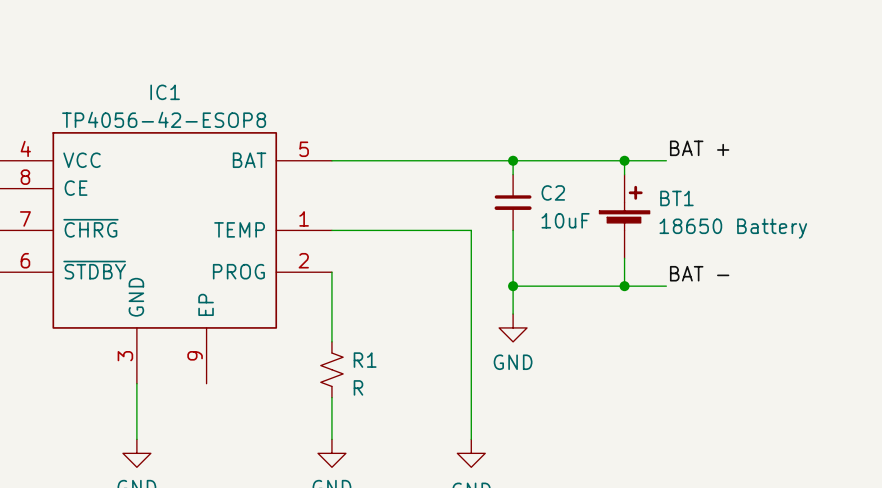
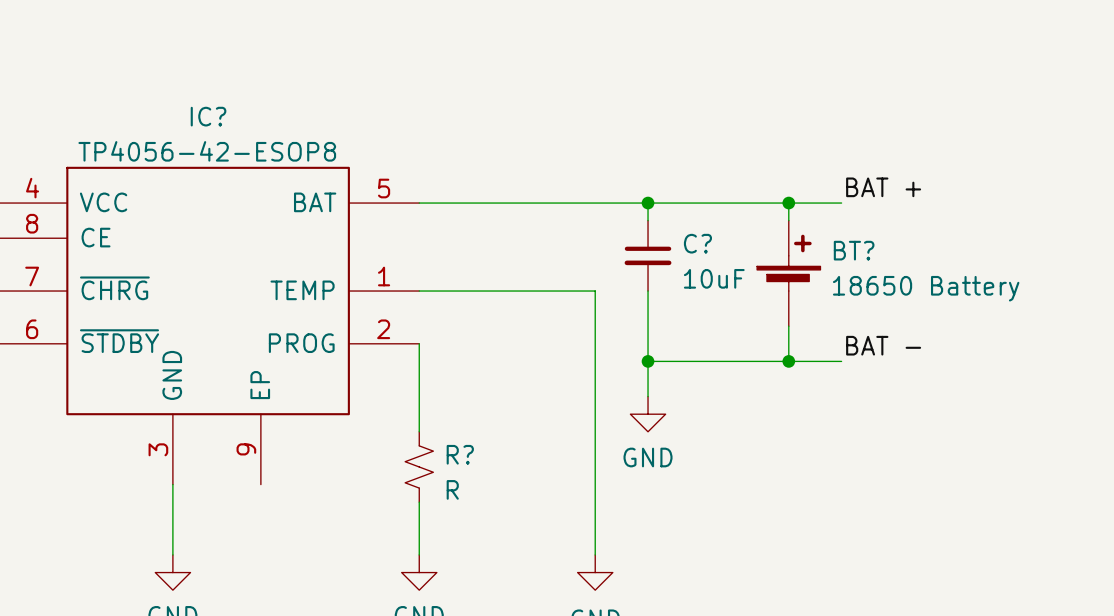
IC1 name: IC1 (165, 92) -> IC? (208, 116)
C2 name: C2 (553, 192) -> C? (697, 243)
BT1 name: BT1 (676, 198) -> BT? (854, 250)
R1 name: R1 (365, 360) -> R? (460, 454)

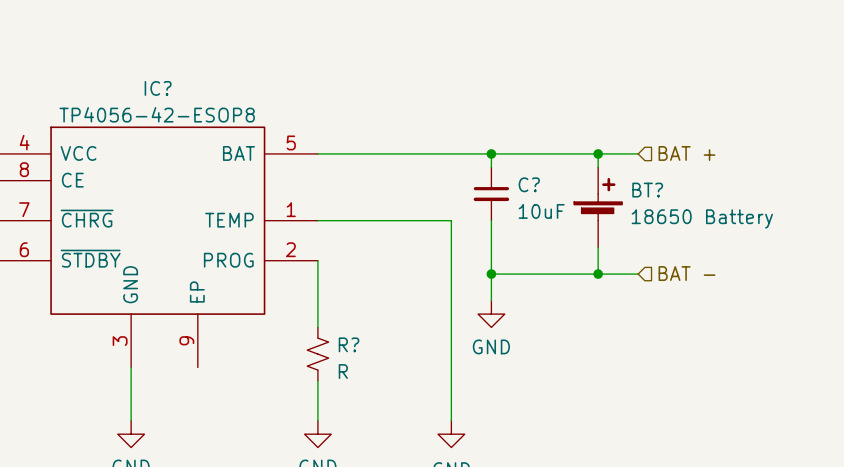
label: BAT + (883, 187) -> none
hierarchical label: none -> BAT + (687, 153)
label: BAT - (883, 345) -> none
hierarchical label: none -> BAT - (687, 273)

